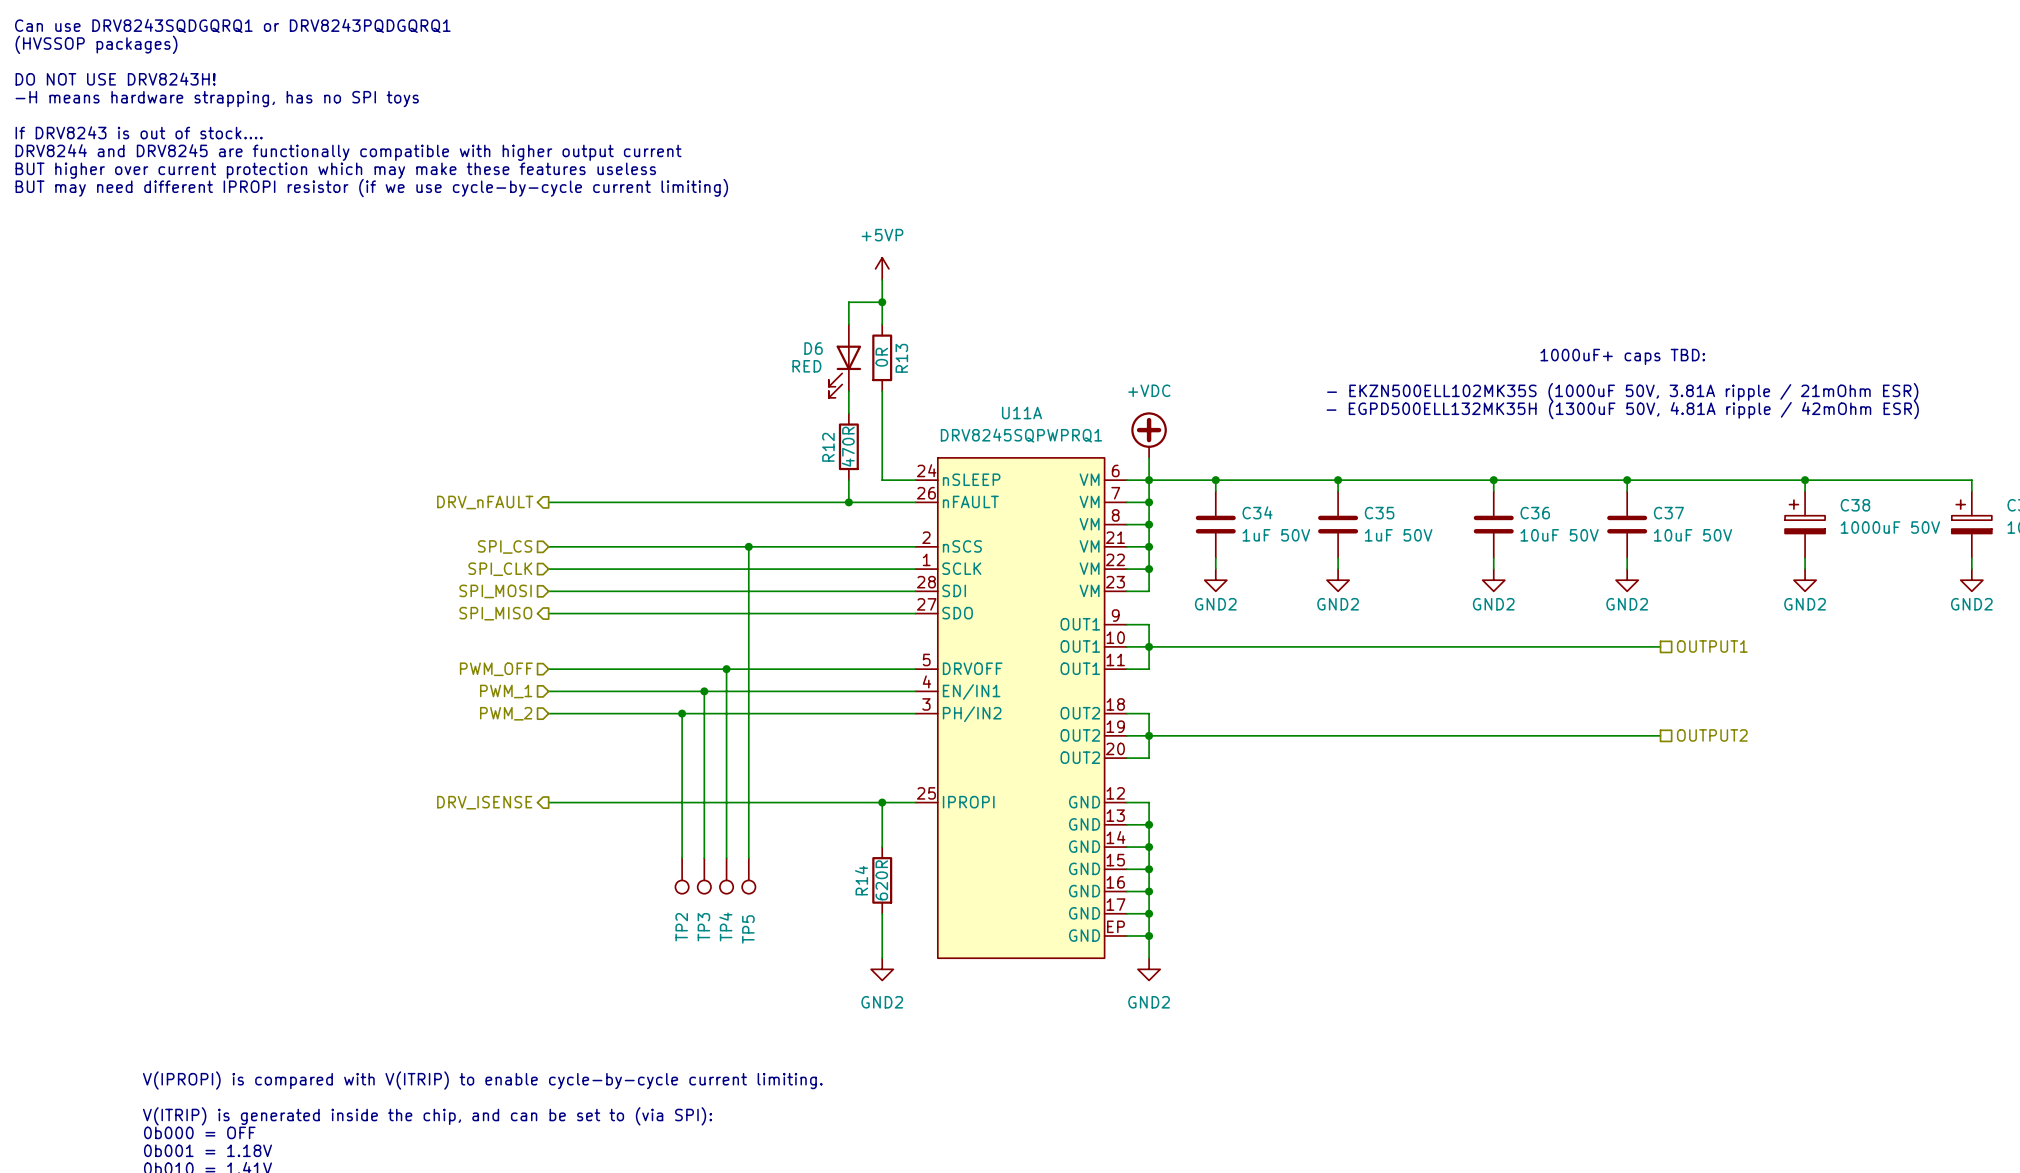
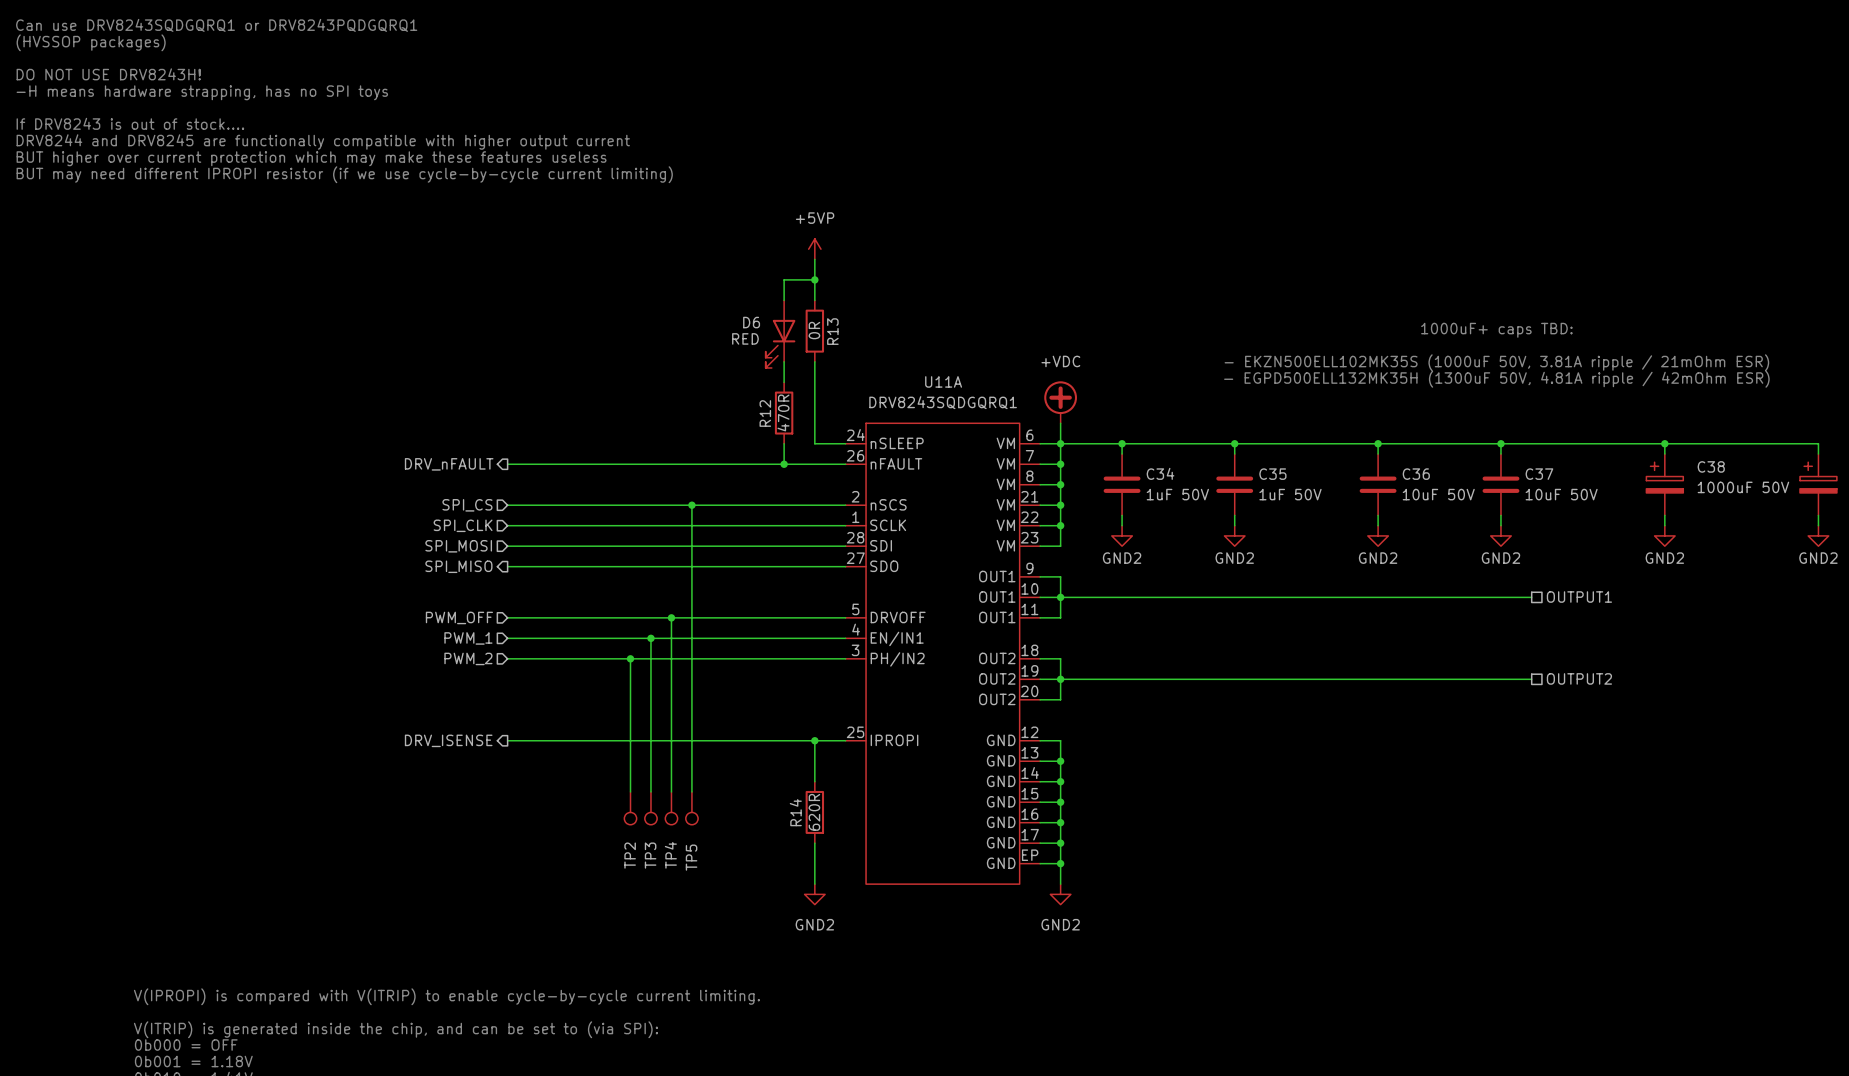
U11A value: DRV8245SQPWPRQ1 (1021, 435) -> DRV8243SQDGQRQ1 (943, 402)

